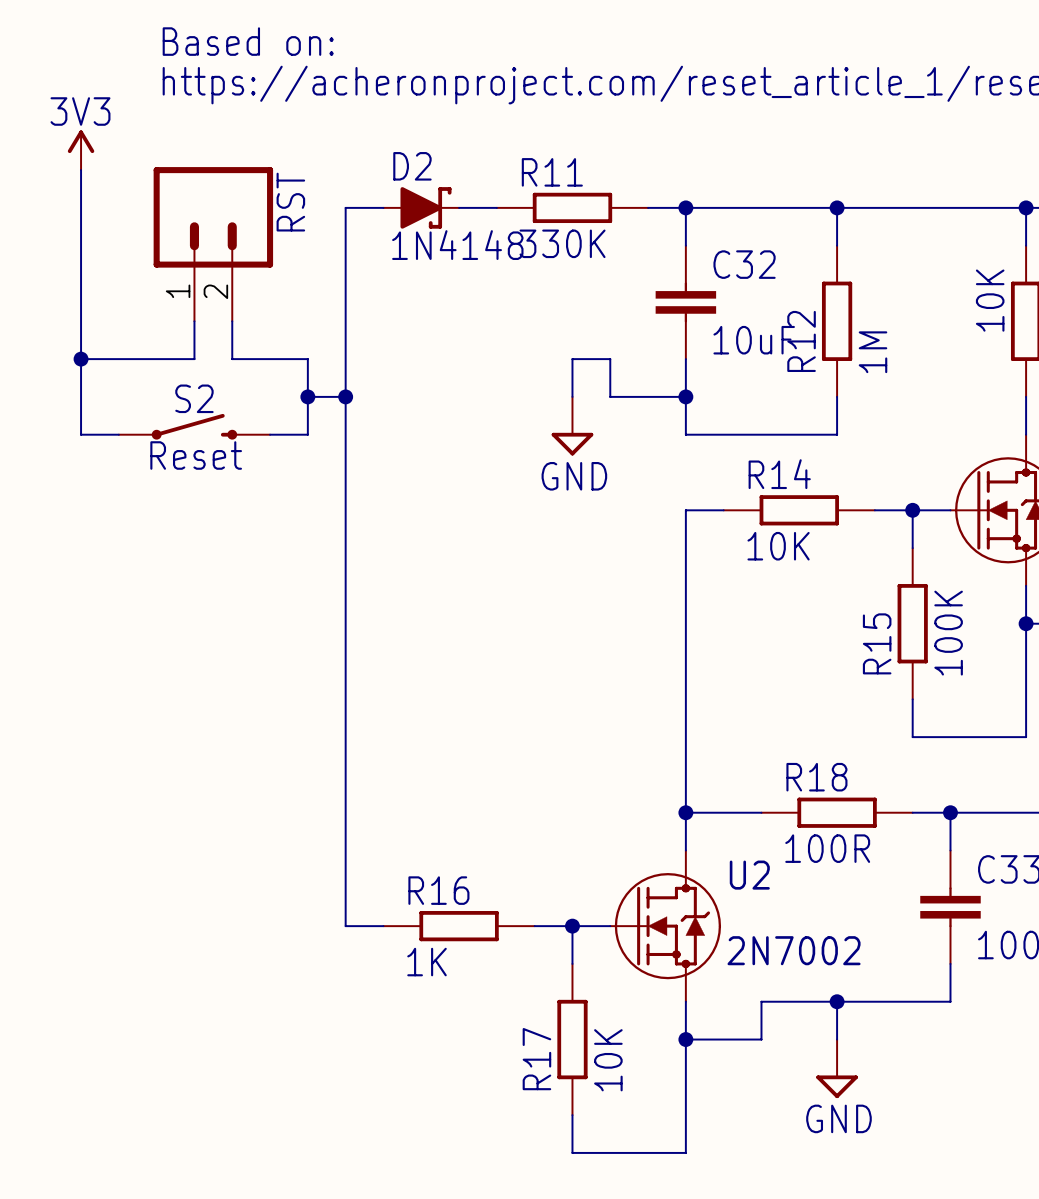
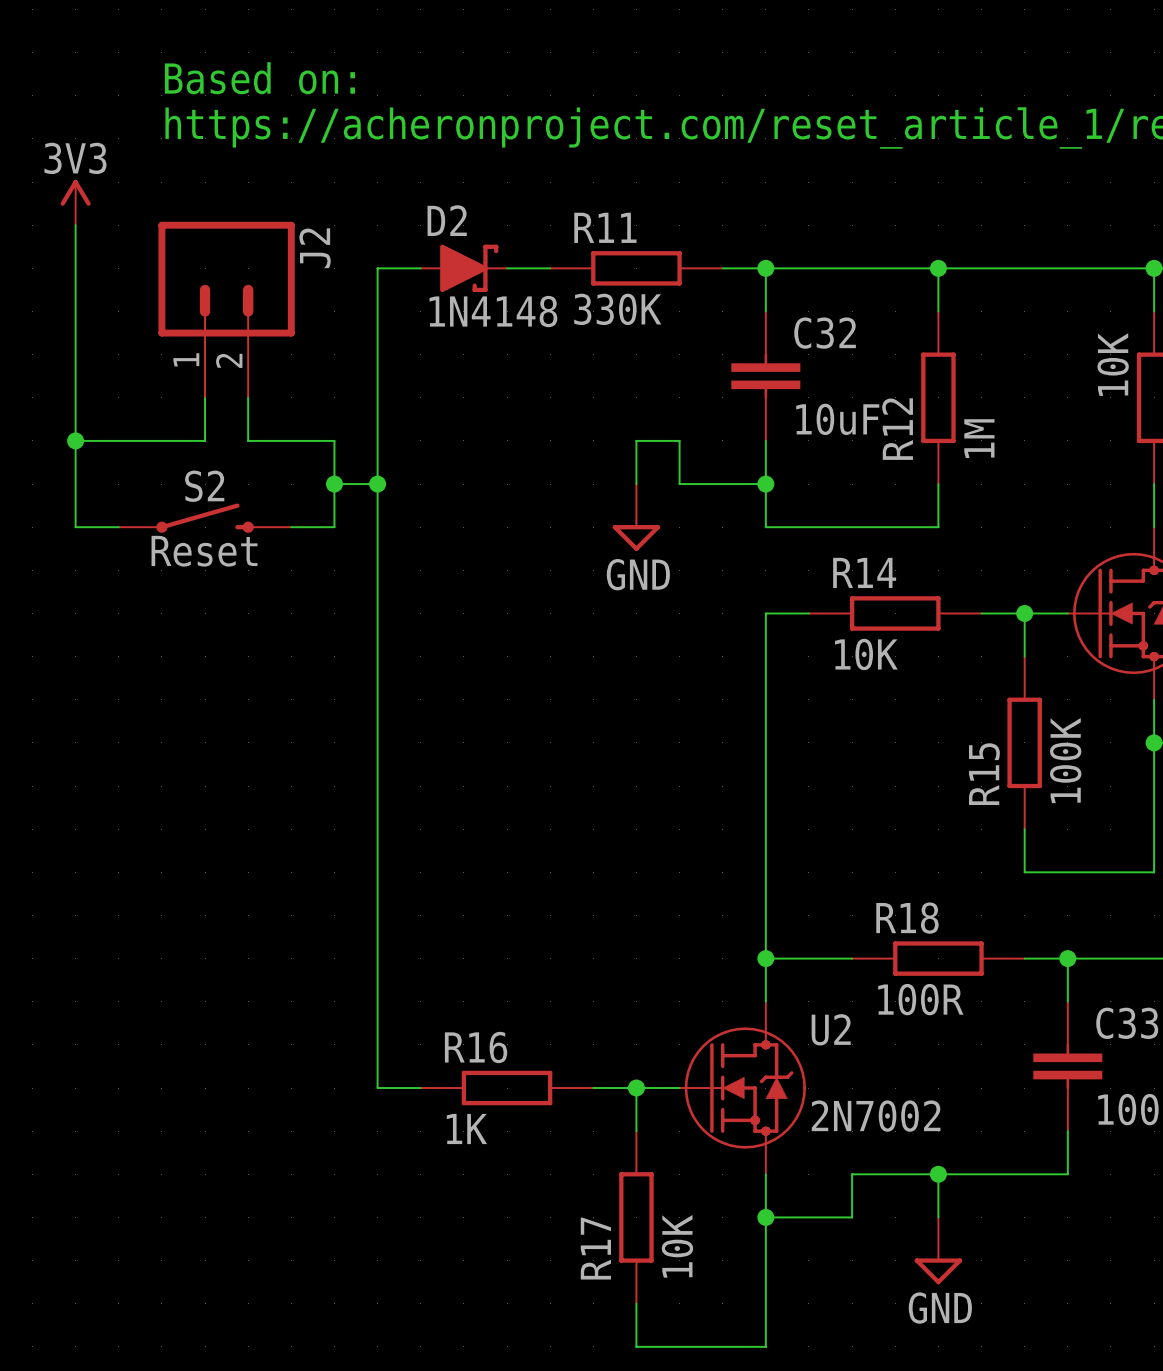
RST name: RST (290, 202) -> J2 (315, 248)

